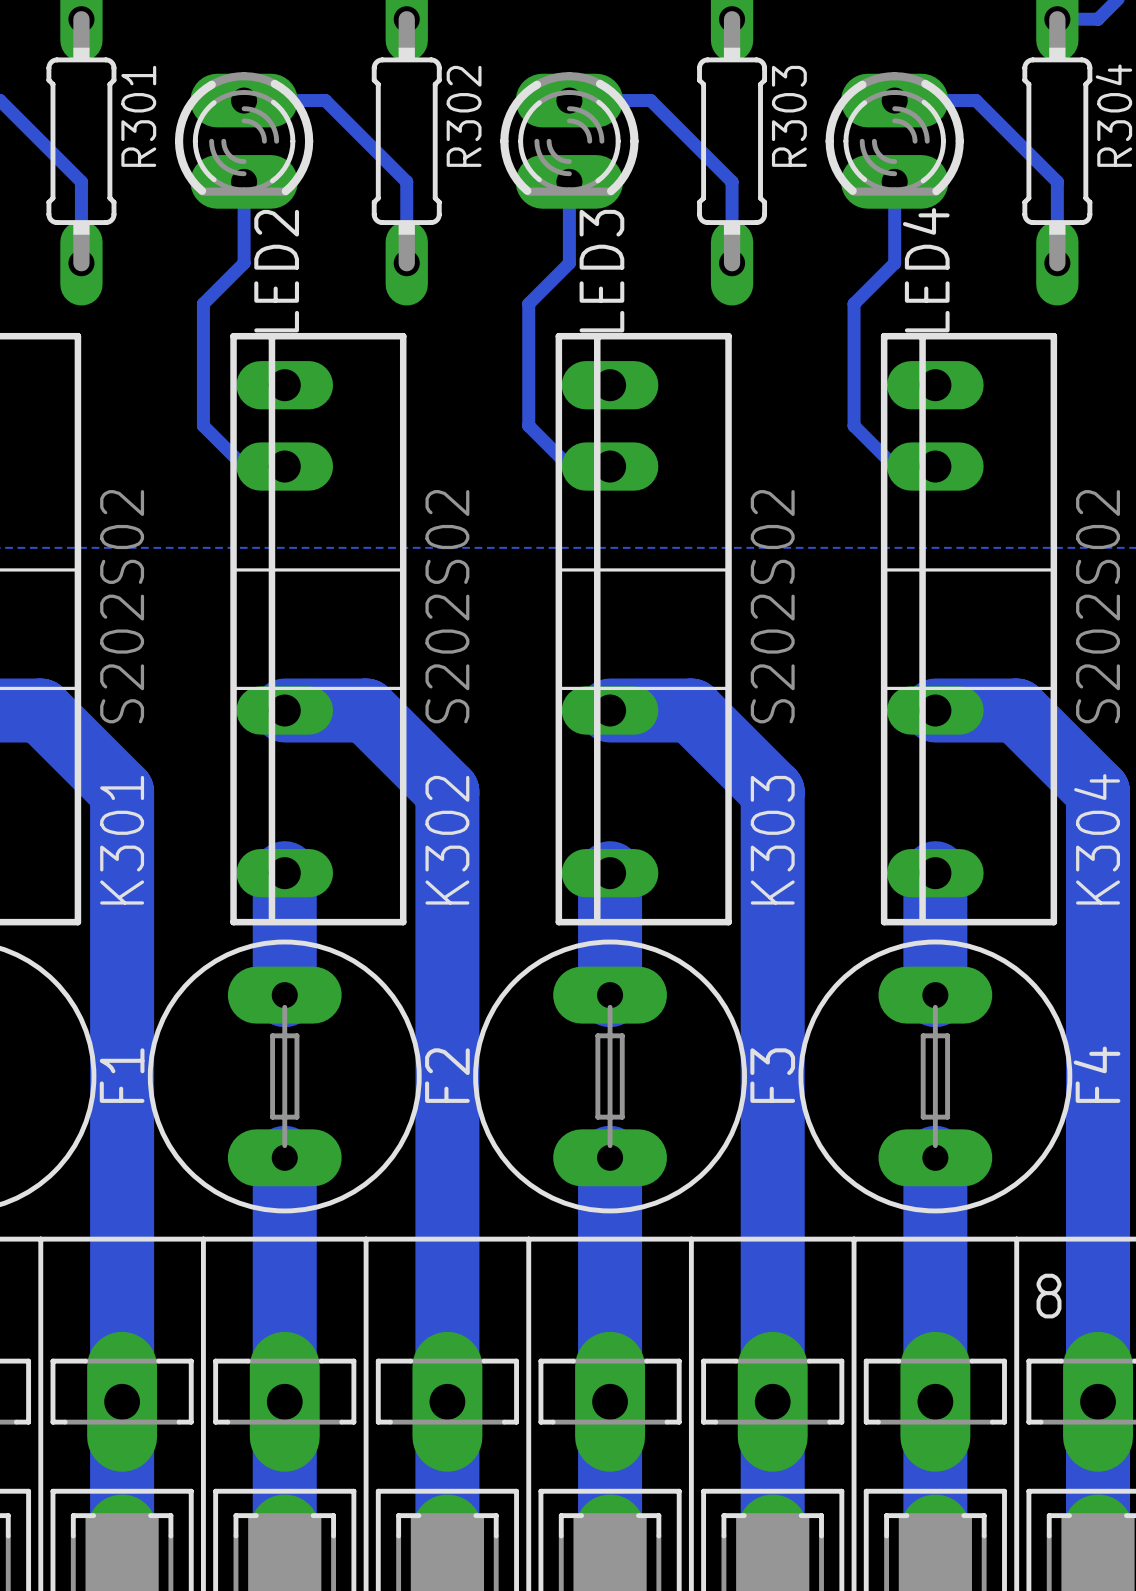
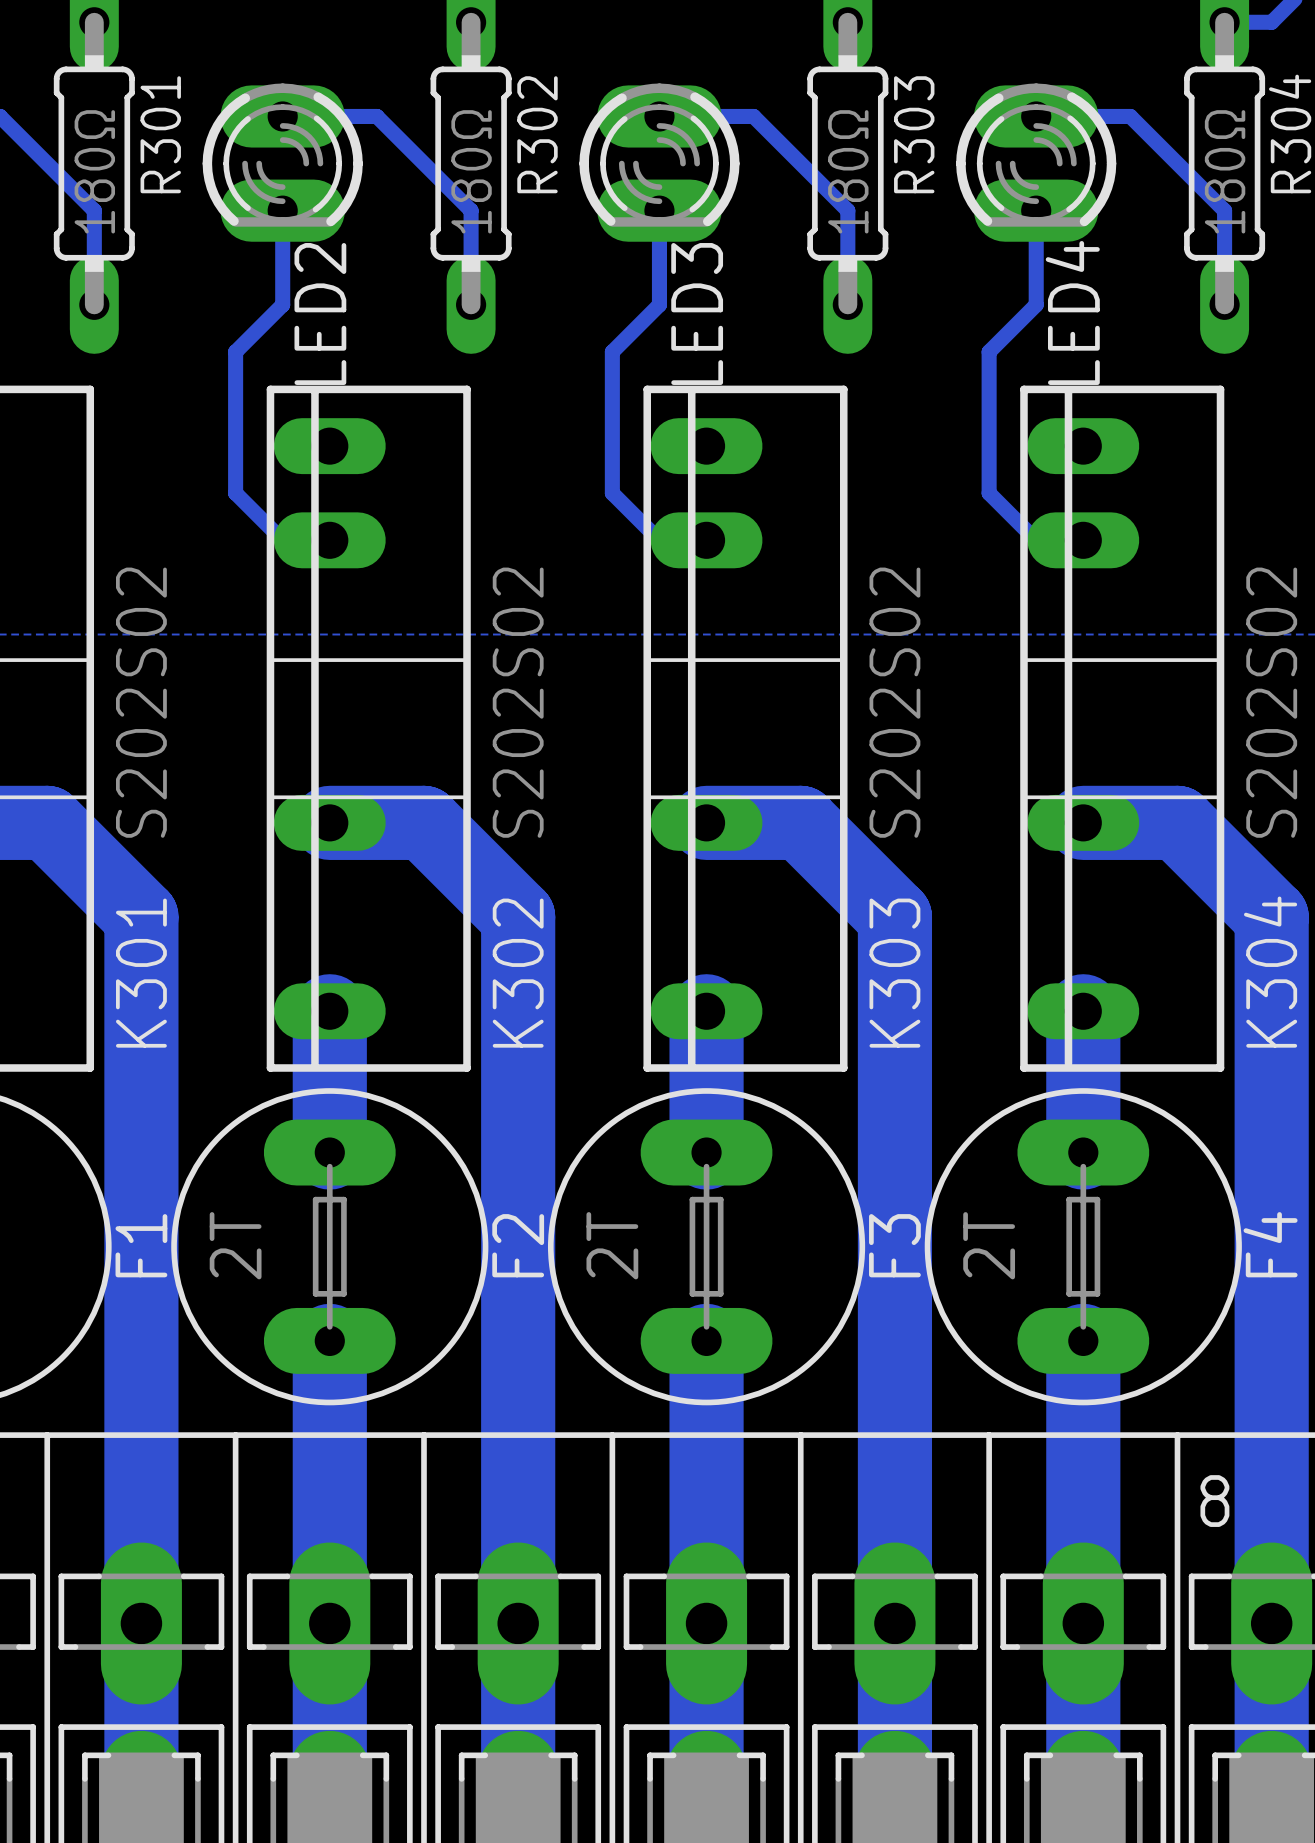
R301 value: none -> 180Ω (94, 171)
R302 value: none -> 180Ω (471, 171)
R303 value: none -> 180Ω (848, 171)
R304 value: none -> 180Ω (1225, 171)
F2 value: none -> 2T (235, 1245)
F3 value: none -> 2T (612, 1245)
F4 value: none -> 2T (989, 1245)

